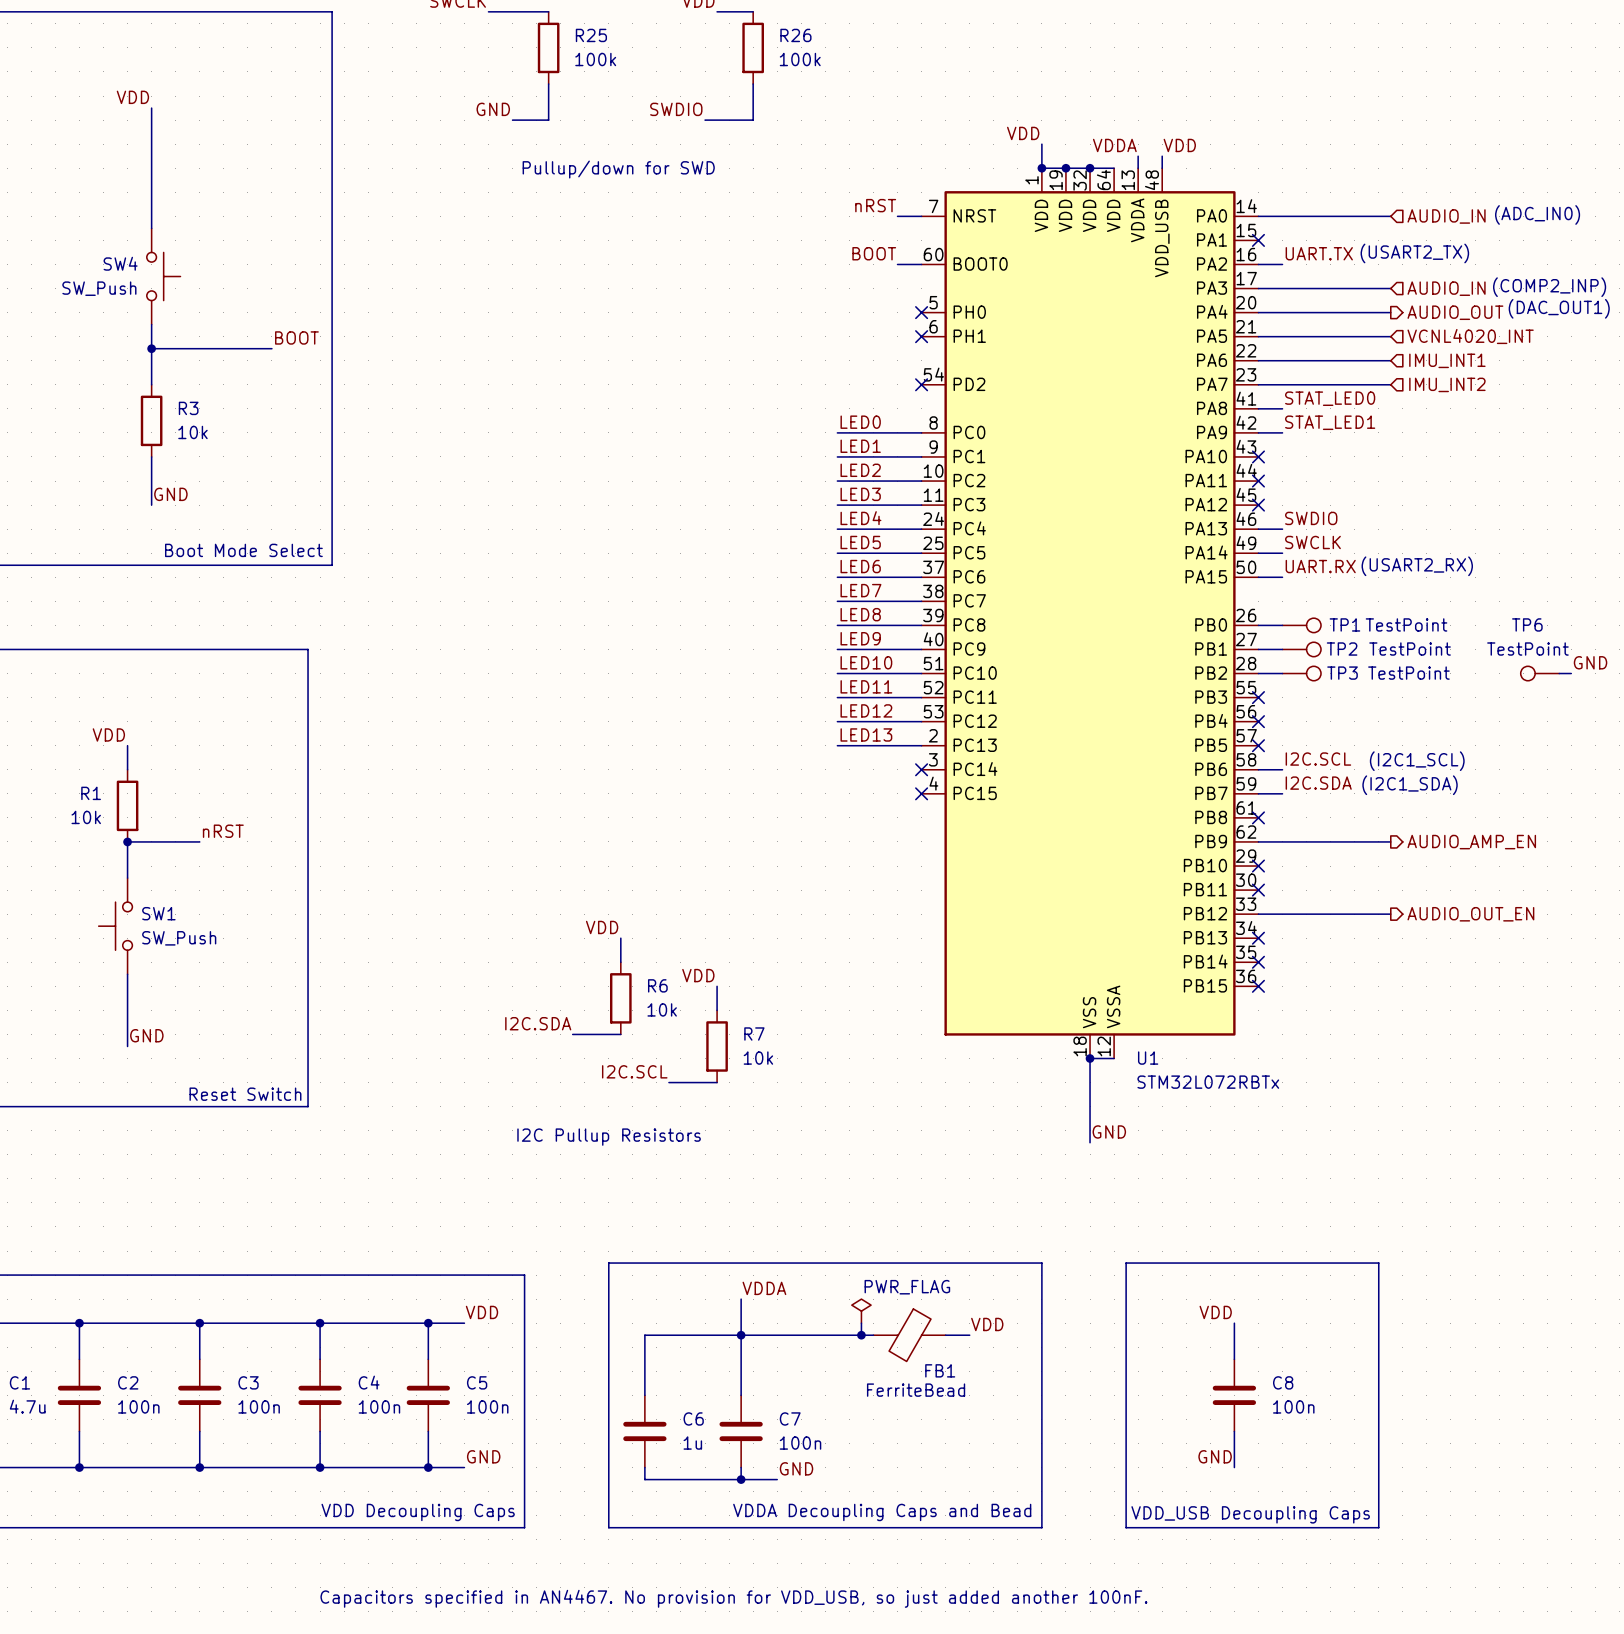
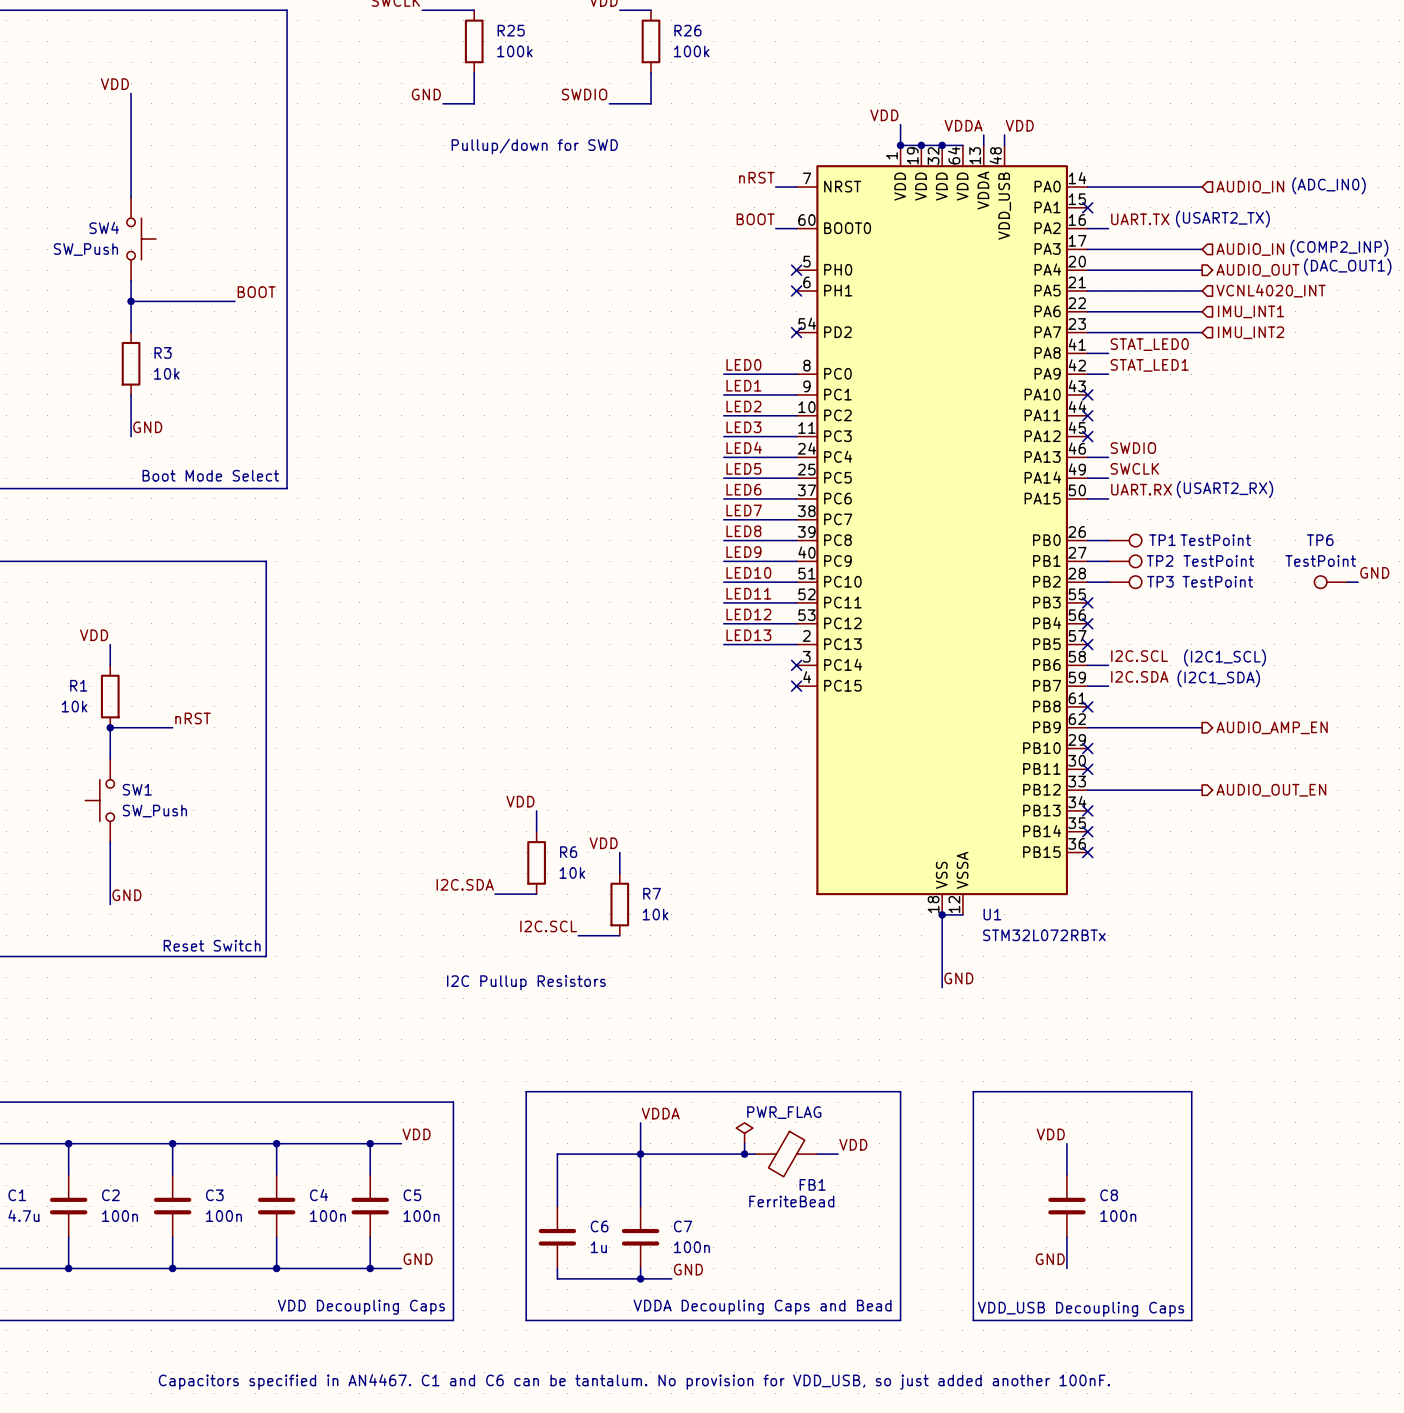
text: Capacitors specified in AN4467. No provision for VDD_USB, so just added another 100nF. (733, 1598) -> Capacitors specified in AN4467. C1 and C6 can be tantalum. No provision for VDD_USB, so just added another 100nF. (634, 1381)

